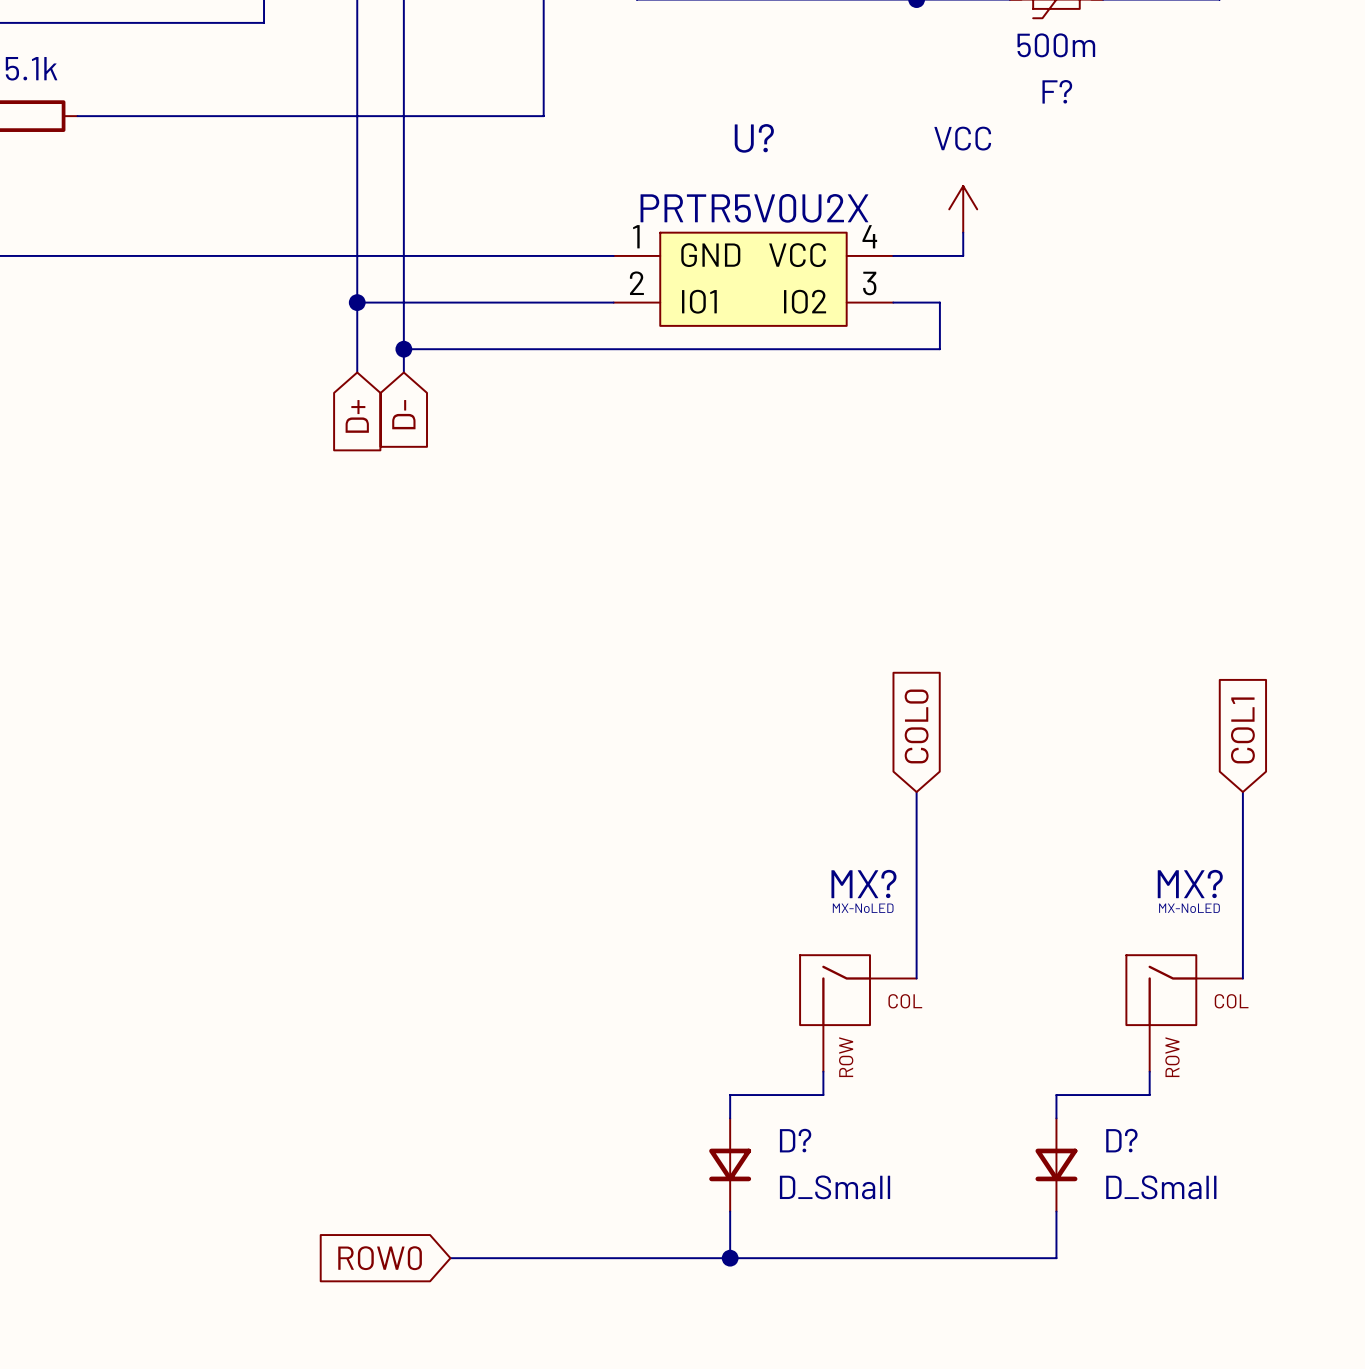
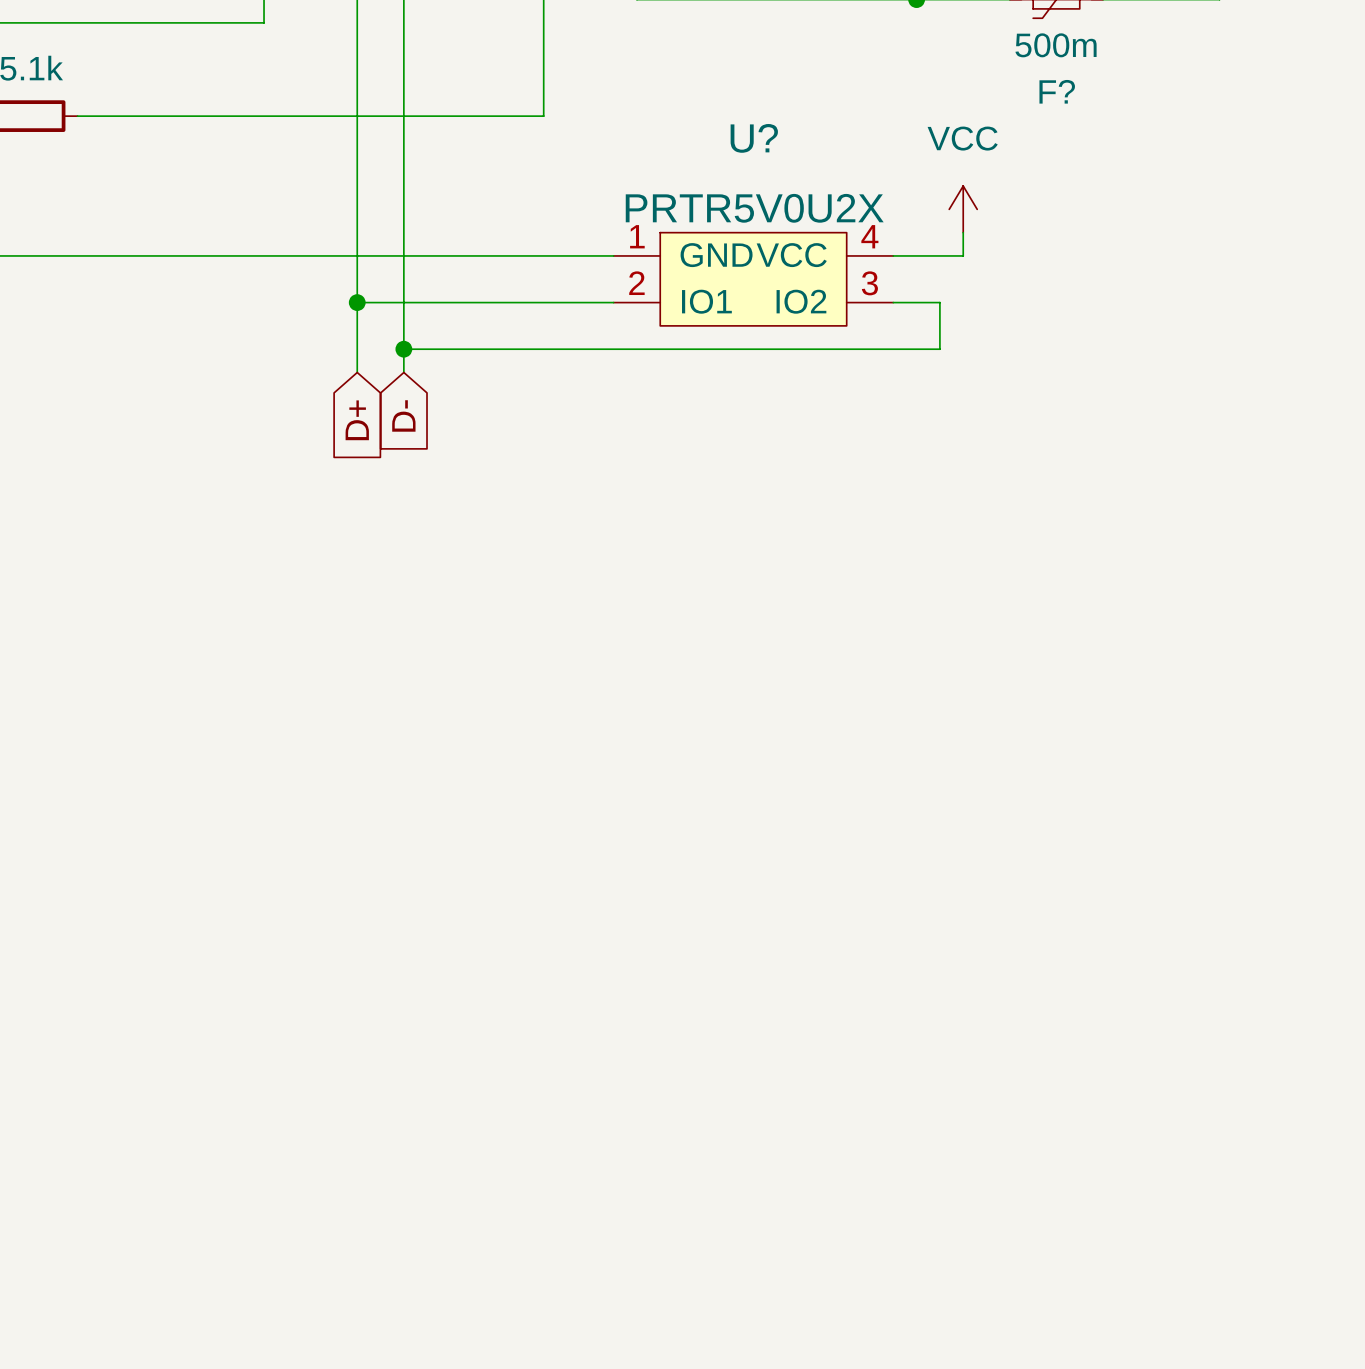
global label: COL0 (916, 726) -> none
global label: COL1 (1242, 730) -> none
wire: (916, 792) (916, 978) -> none
wire: (1242, 792) (1242, 978) -> none
MX?: MX-NoLED (858, 1013) -> none
MX?: MX-NoLED (1184, 1013) -> none
wire: (823, 1071) (823, 1095) (730, 1095) (730, 1118) -> none
wire: (1149, 1071) (1149, 1095) (1056, 1095) (1056, 1118) -> none
D?: D_Small (730, 1164) -> none
D?: D_Small (1056, 1164) -> none
wire: (730, 1211) (730, 1258) -> none
wire: (1056, 1211) (1056, 1258) (450, 1258) -> none
global label: ROW0 (380, 1258) -> none
junction: (730, 1258) -> none

